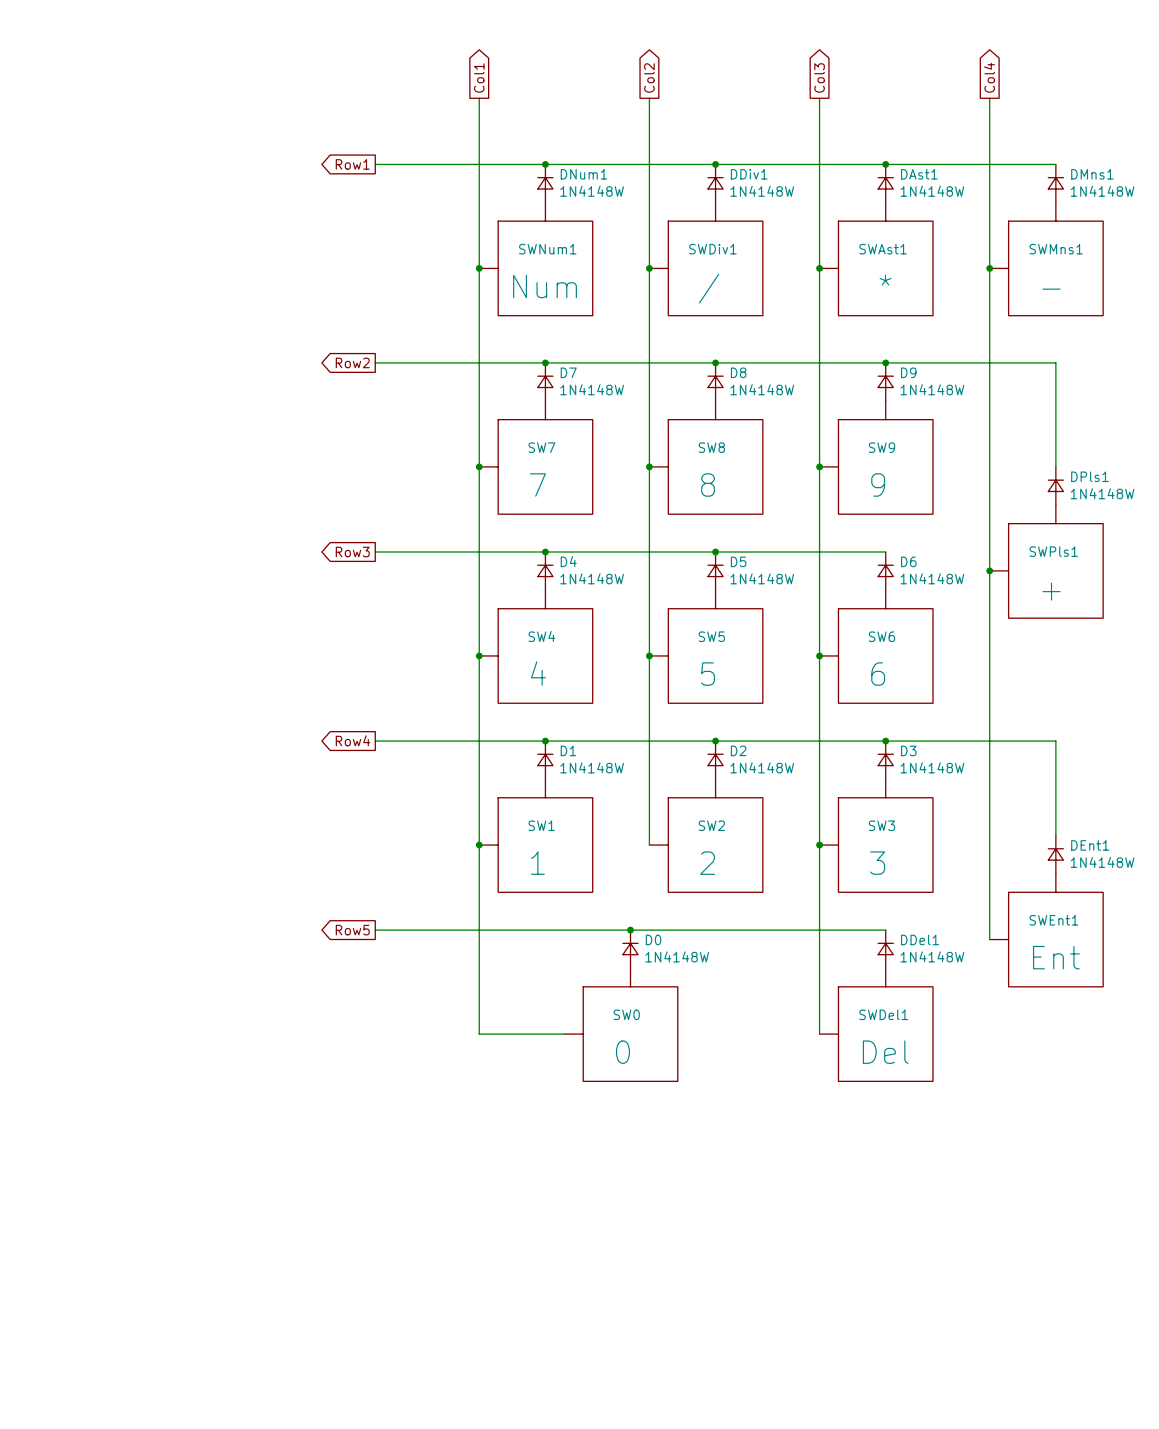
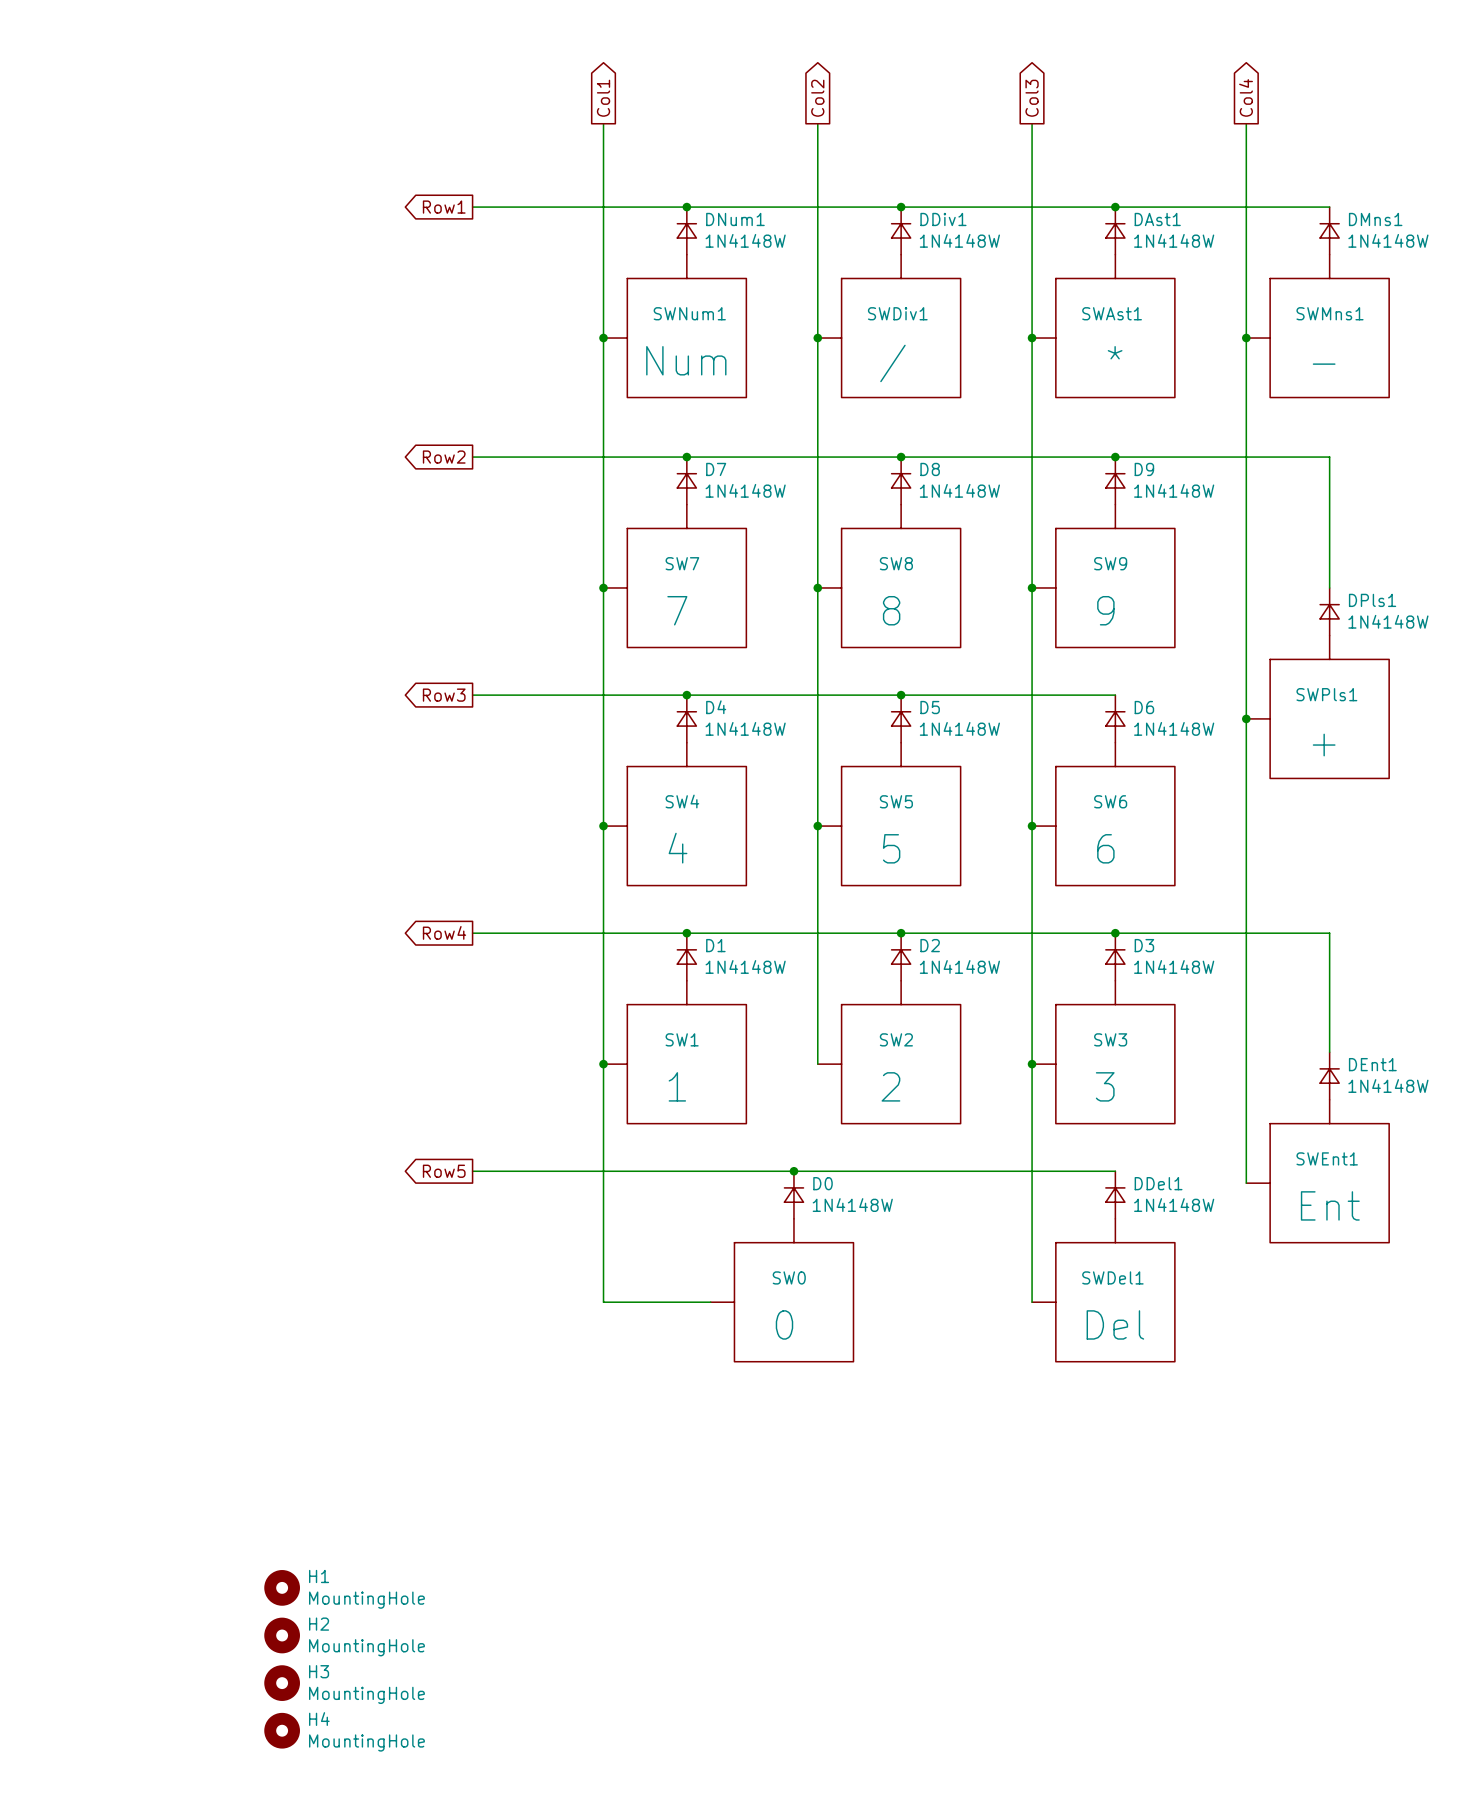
H1: none -> MountingHole (282, 1587)
H2: none -> MountingHole (282, 1635)
H3: none -> MountingHole (282, 1683)
H4: none -> MountingHole (282, 1730)

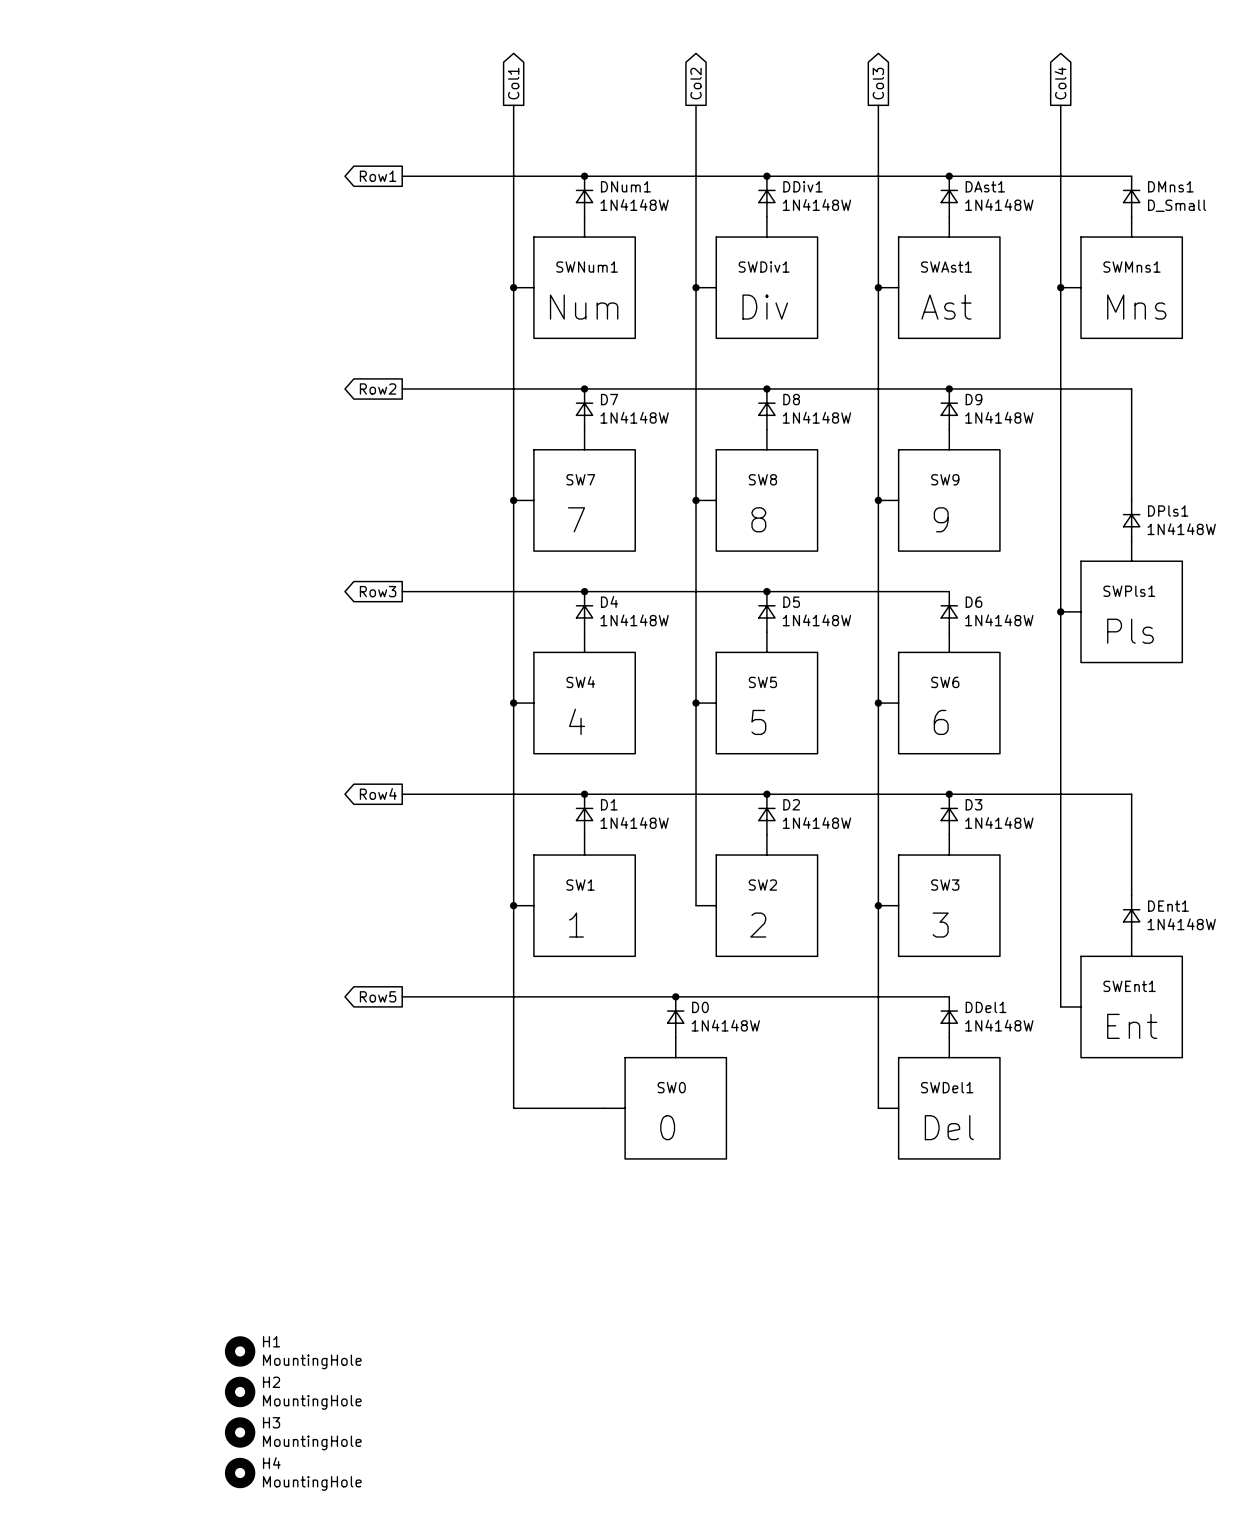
DMns1 value: 1N4148W (1388, 240) -> D_Small (1177, 205)
SWAst1 value: * (1115, 352) -> Ast (946, 307)
SWDiv1 value: / (892, 363) -> Div (765, 307)
SWMns1 value: - (1324, 364) -> Mns (1136, 307)
SWPls1 value: + (1324, 745) -> Pls (1130, 631)

